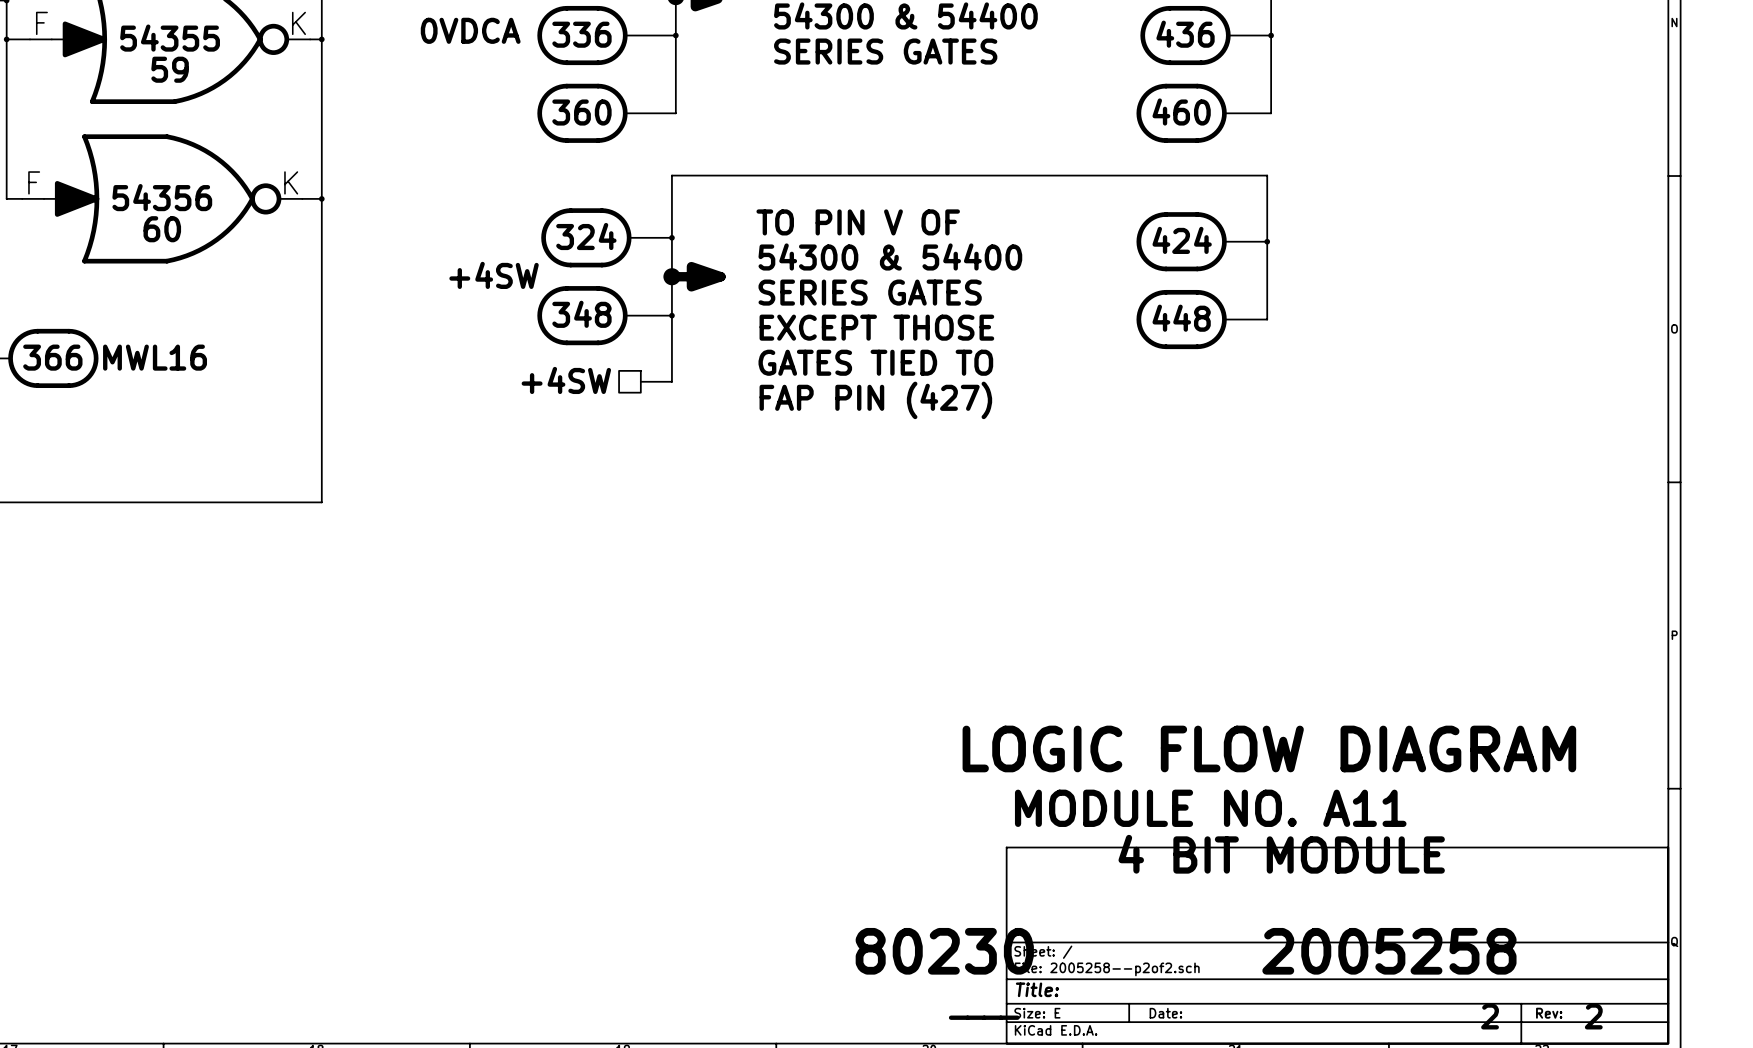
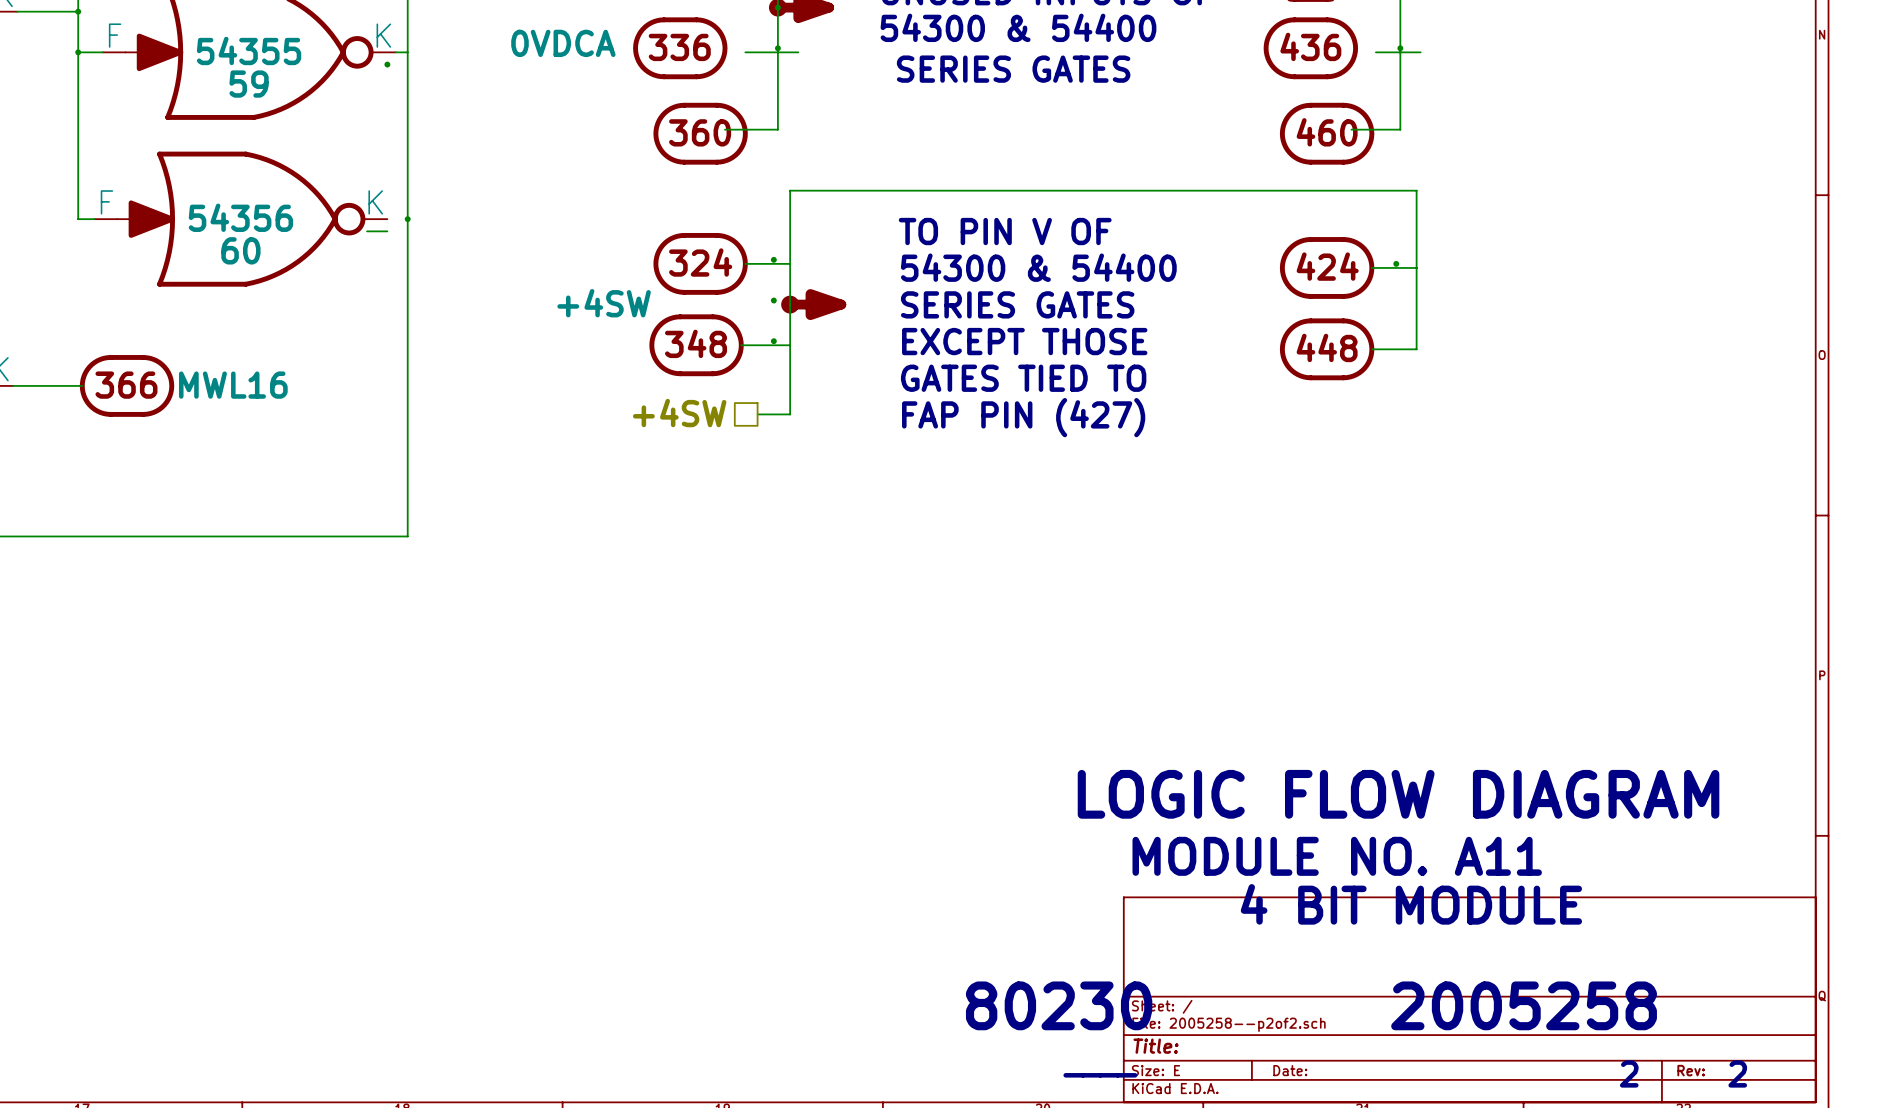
wire: (625, 35) (675, 35) -> (745, 52) (798, 52)
wire: (1228, 35) (1271, 35) -> (1375, 52) (1420, 52)
junction position: (321, 39) -> (387, 64)
text position: SERIES GATES (885, 51) -> SERIES GATES (1013, 69)
part position: (582, 113) -> (700, 133)
part position: (1181, 113) -> (1327, 133)
wire: (302, 198) (321, 198) -> (367, 231) (387, 231)
text position: TO PIN V OF (858, 222) -> TO PIN V OF (1005, 231)
part position: (586, 237) -> (700, 263)
wire: (629, 237) (671, 237) -> (745, 263) (790, 263)
part position: (1181, 241) -> (1327, 267)
wire: (1224, 241) (1267, 241) -> (1371, 267) (1416, 267)
text position: 54300 & 54400 (890, 256) -> 54300 & 54400 (1038, 267)
part position: (694, 276) -> (813, 304)
text position: SERIES GATES (870, 292) -> SERIES GATES (1017, 304)
part position: (582, 315) -> (696, 345)
wire: (625, 315) (671, 315) -> (741, 345) (790, 345)
part position: (1181, 319) -> (1327, 349)
wire: (1224, 319) (1267, 319) (1267, 175) (671, 175) (671, 381) (640, 381) -> none
wire: none -> (1371, 349) (1416, 349) (1416, 190) (790, 190) (790, 414) (757, 414)
text position: EXCEPT THOSE (876, 327) -> EXCEPT THOSE (1024, 341)
text position: GATES TIED TO (875, 362) -> GATES TIED TO (1023, 378)
hierarchical label position: +4SW (566, 380) -> +4SW (679, 413)
text position: FAP PIN (427) (875, 400) -> FAP PIN (427) (1023, 417)

